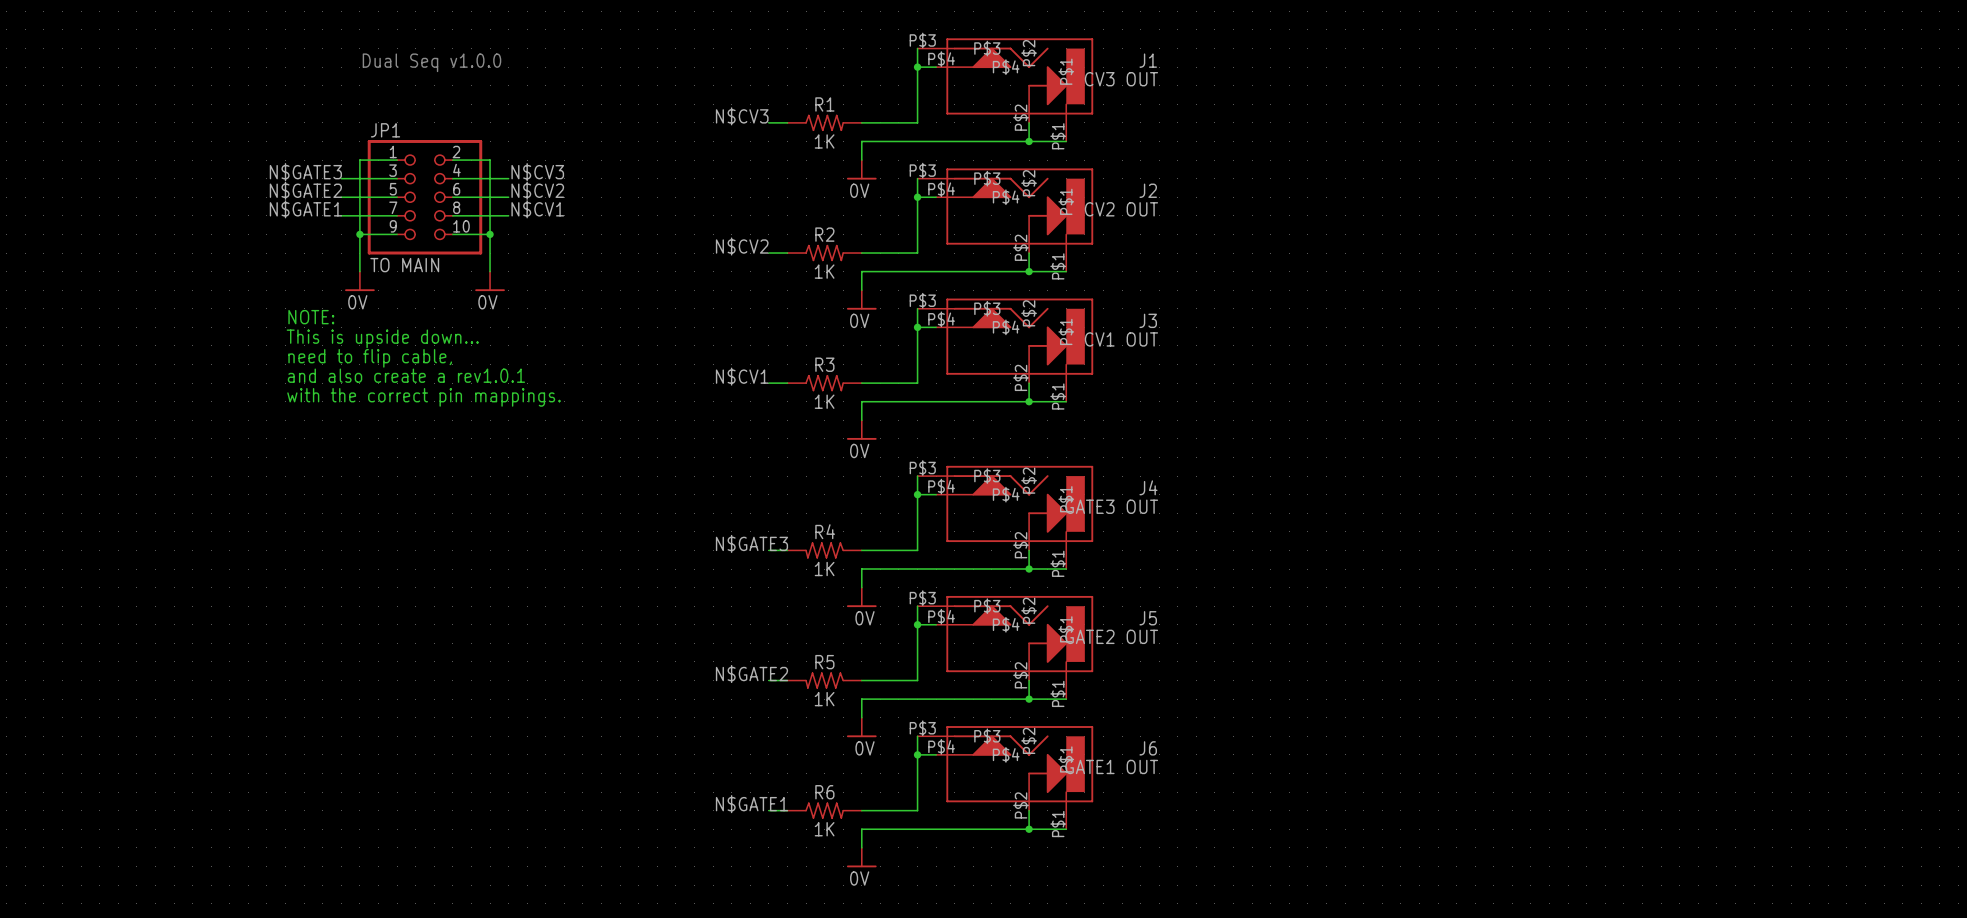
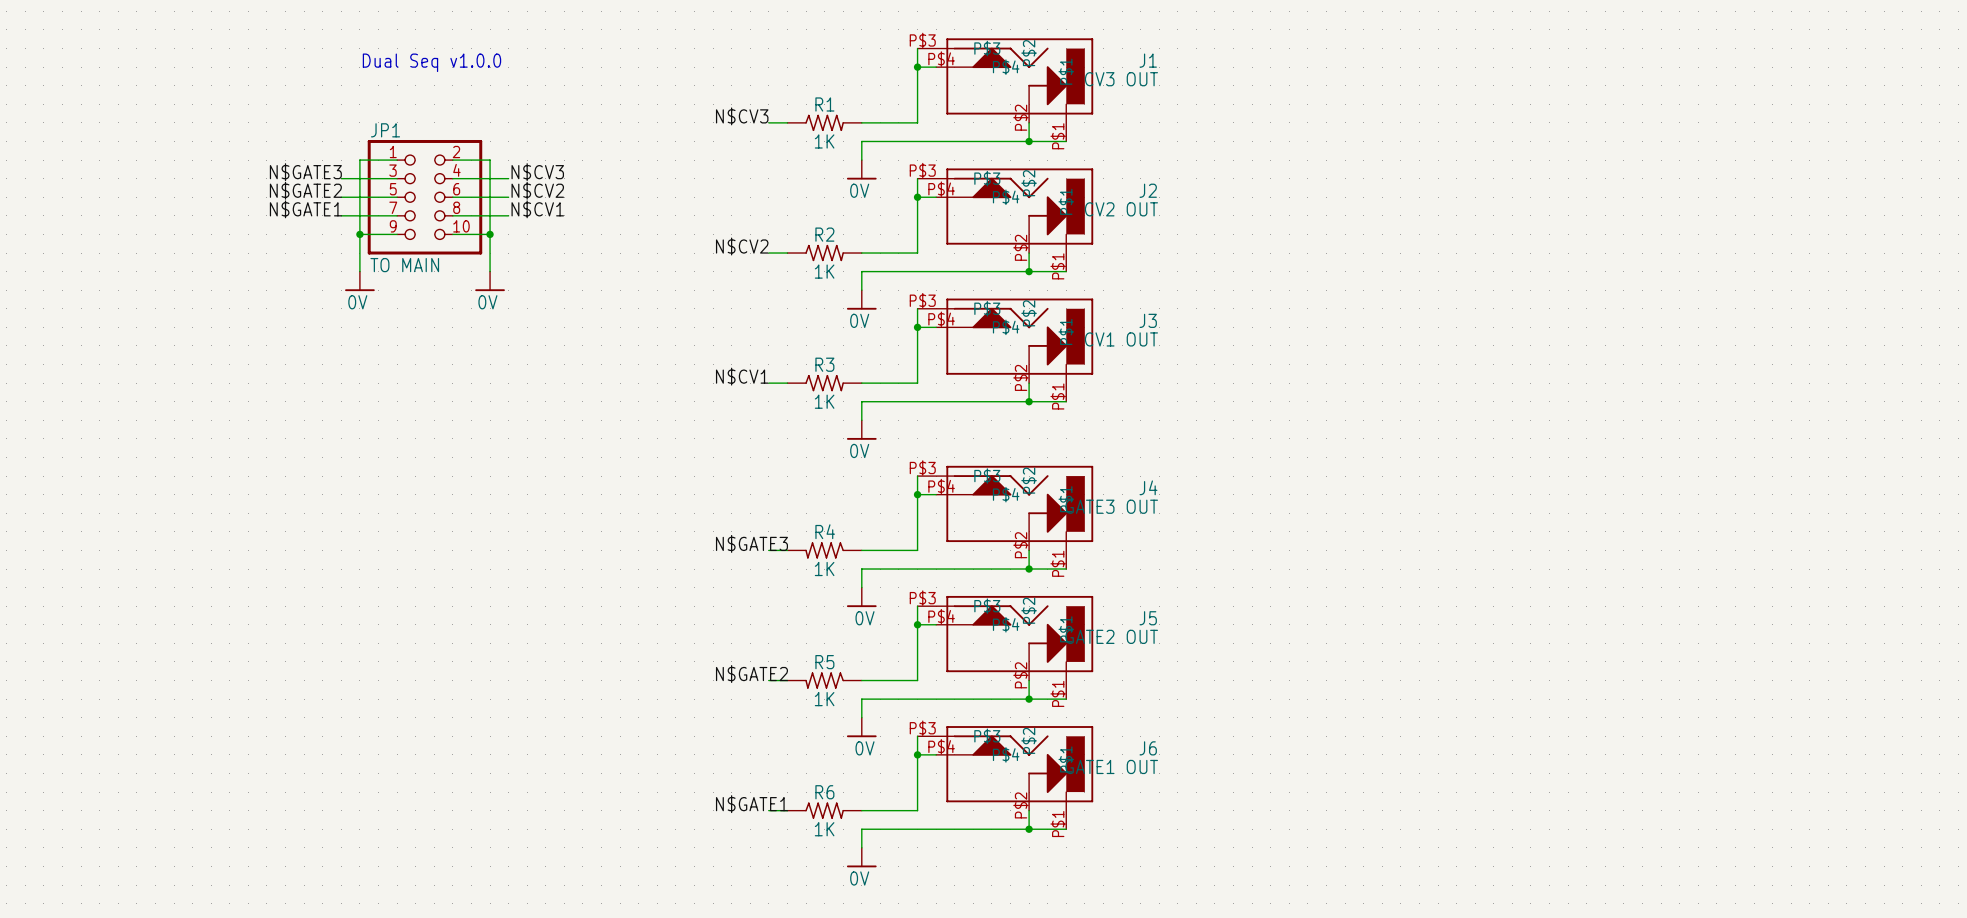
text: NOTE: (311, 317) -> none
text: This is upside down... (382, 338) -> none
text: need to flip cable, (370, 358) -> none
text: and also create a rev1.0.1 (406, 375) -> none
text: with the correct pin mappings. (423, 397) -> none

